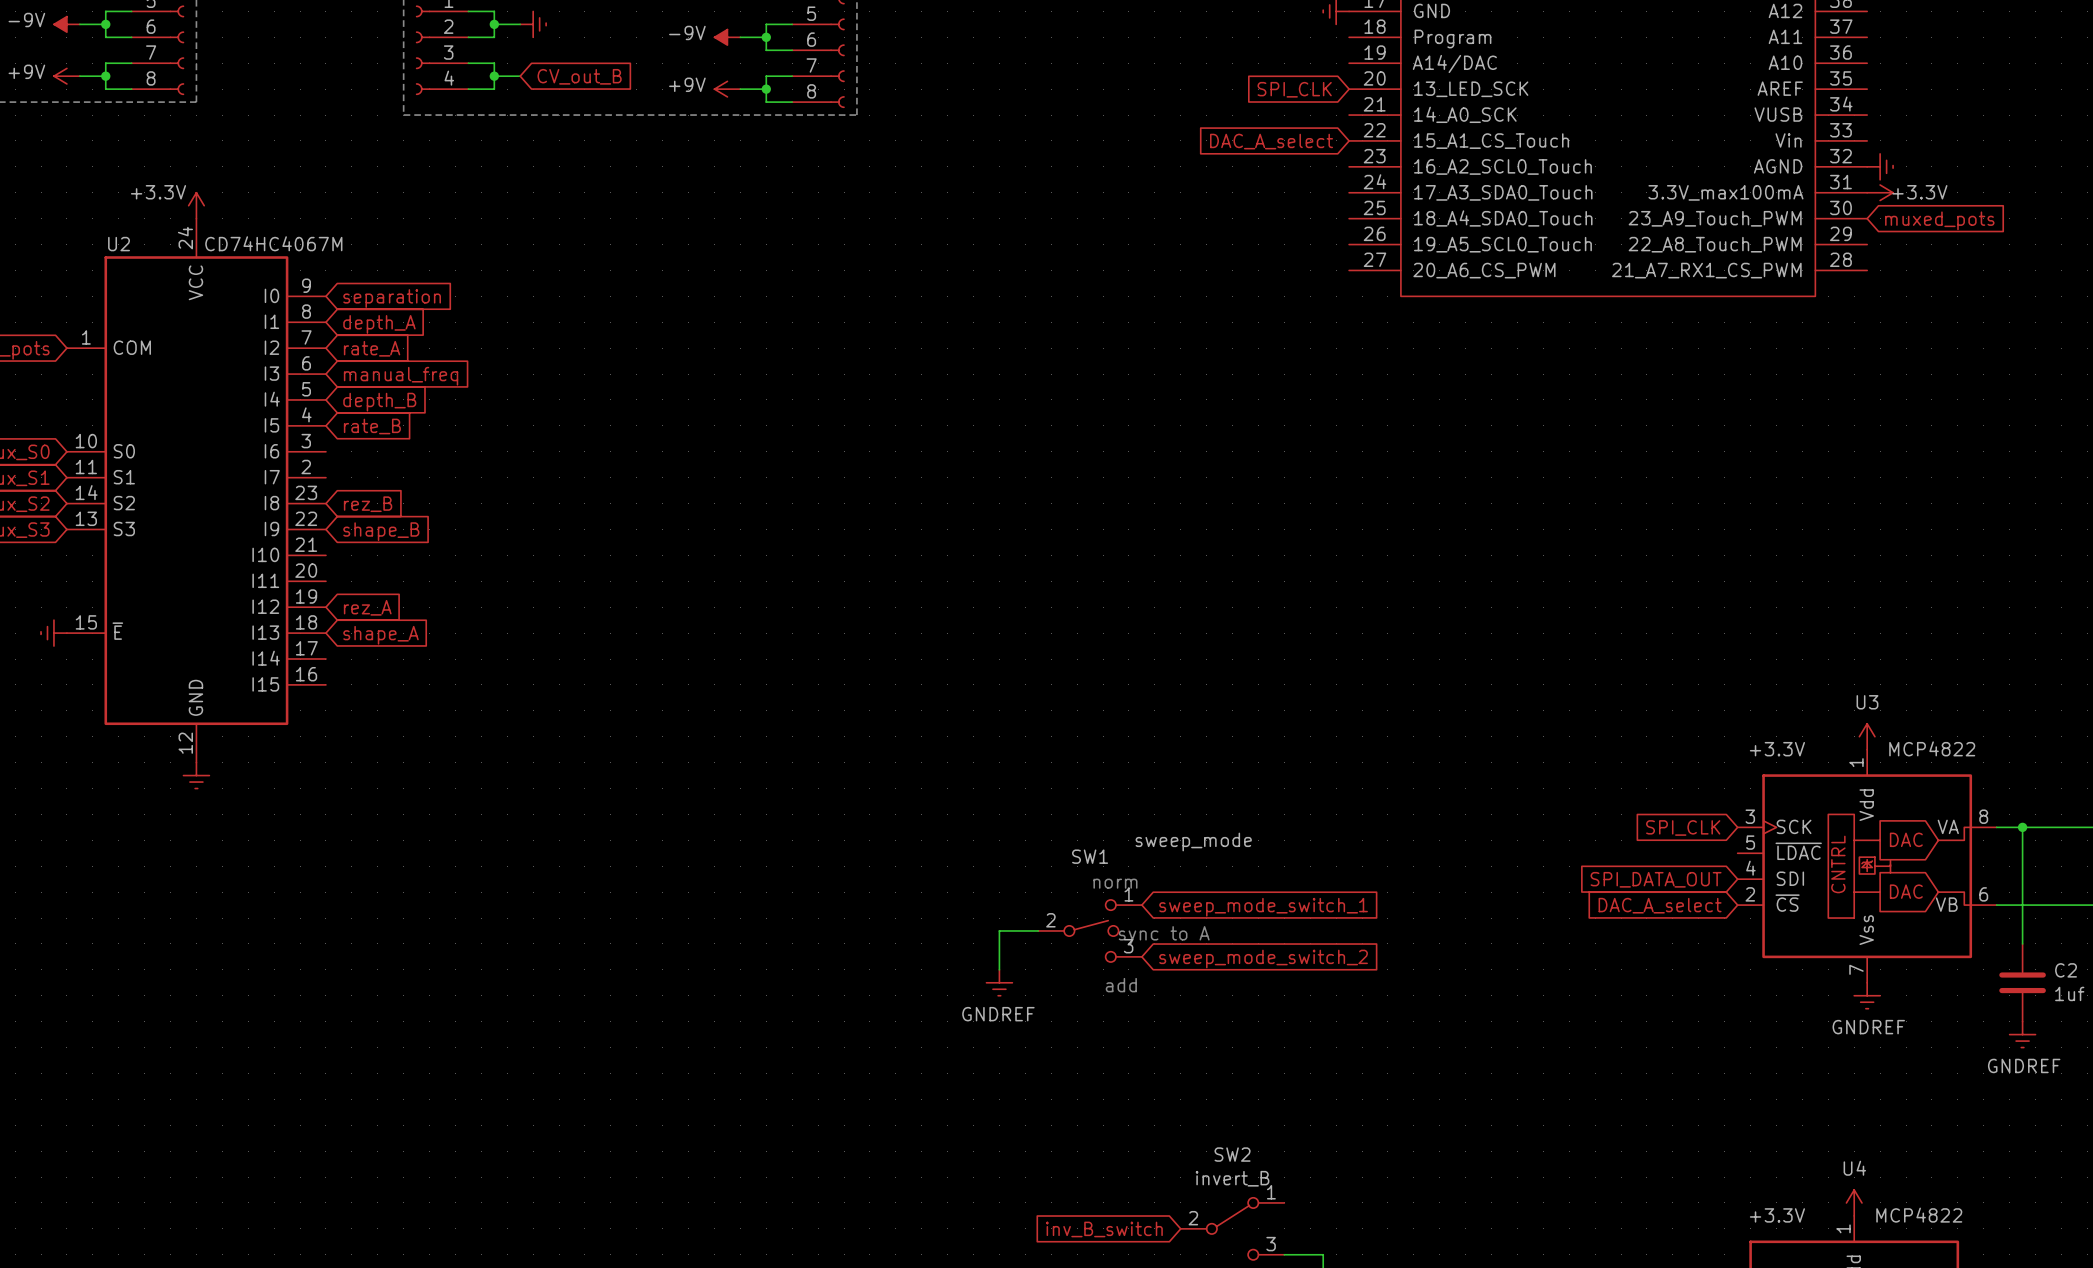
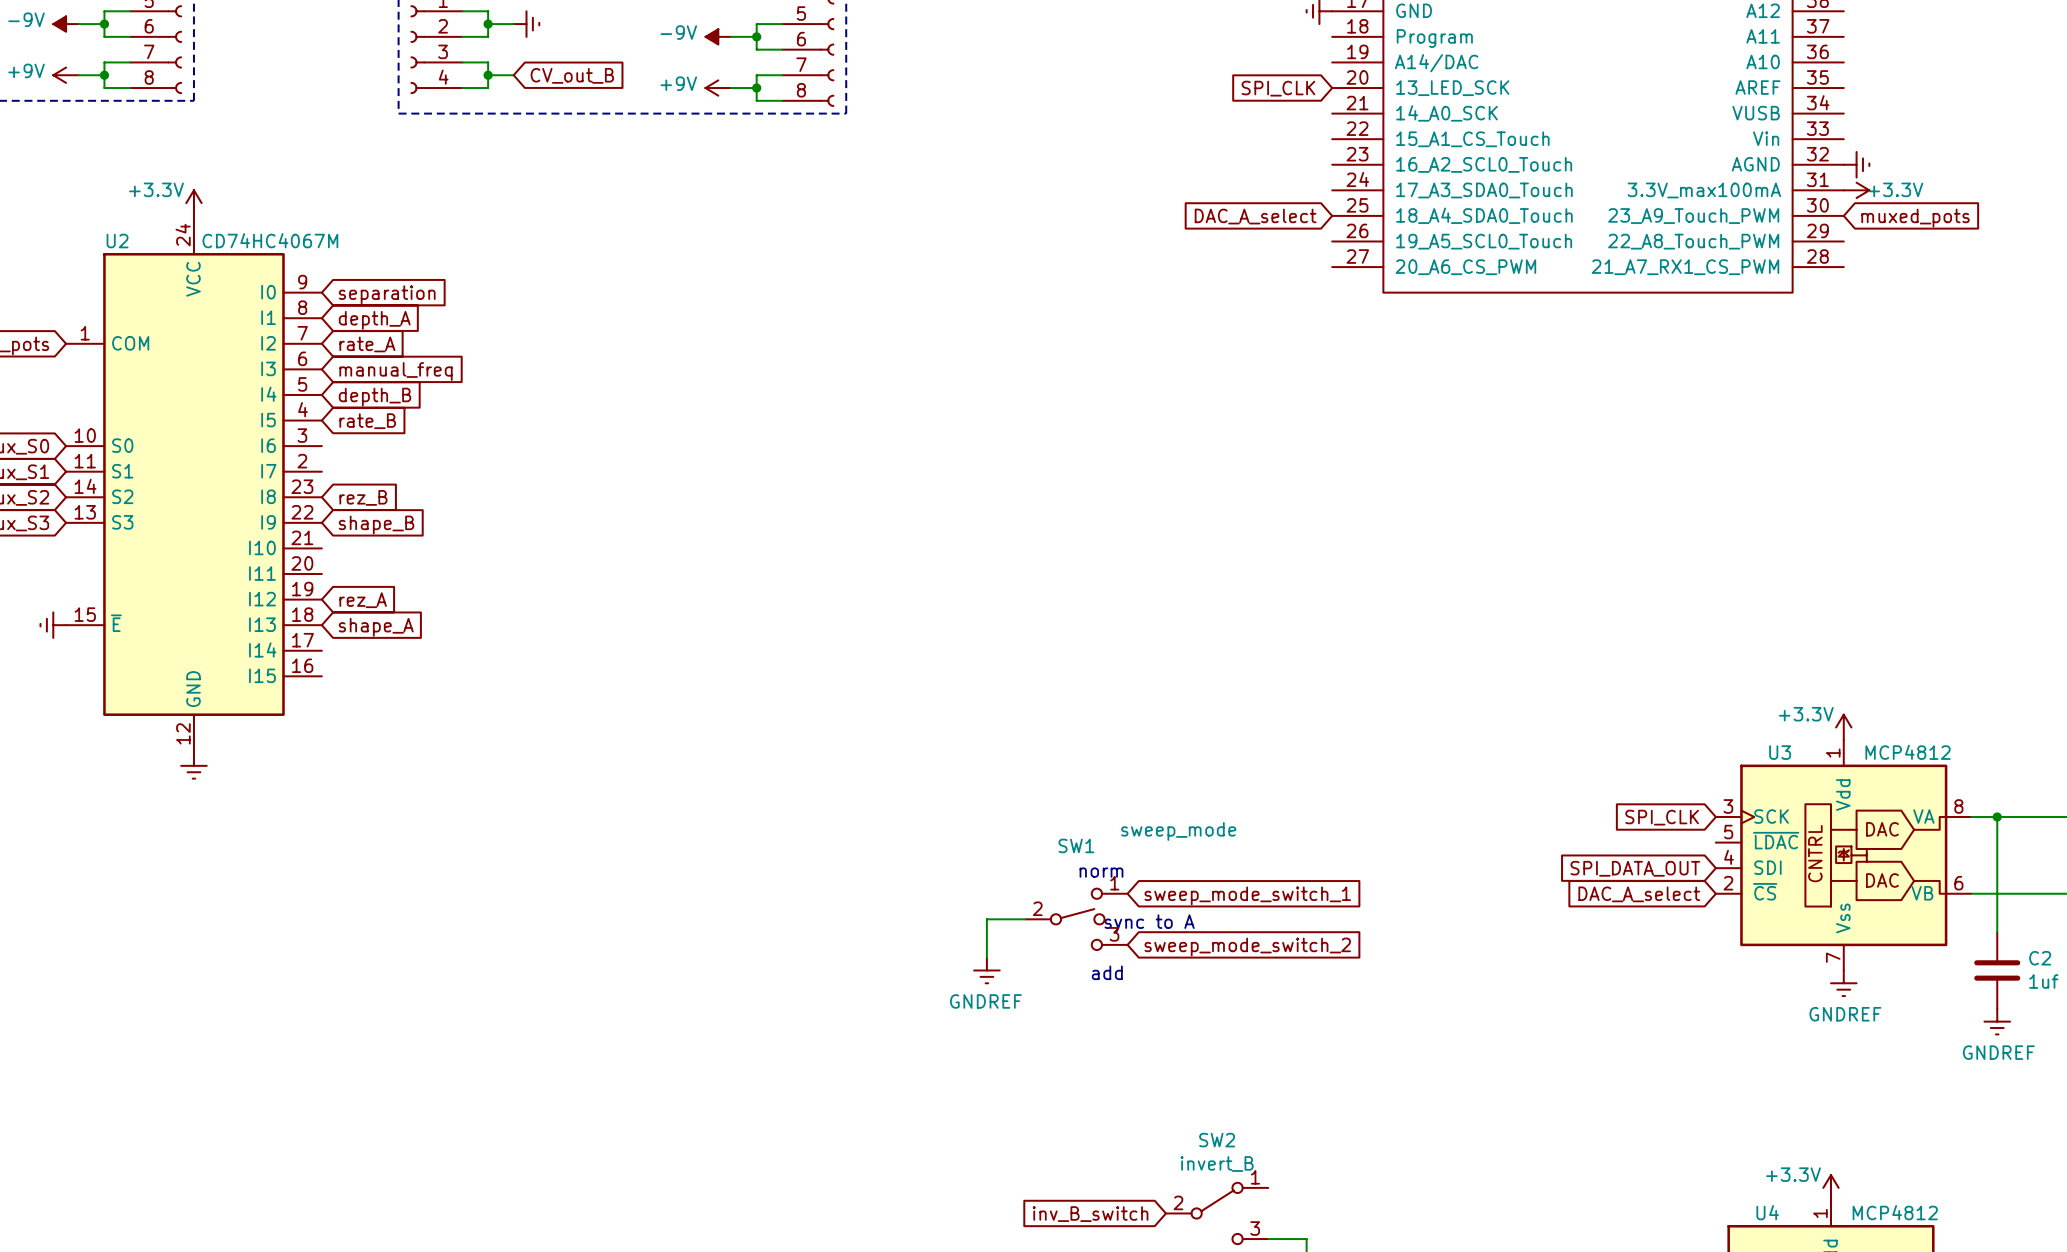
global label position: DAC_A_select (1271, 141) -> DAC_A_select (1255, 216)
U3 name position: U3 (1867, 702) -> U3 (1780, 752)
U3 value: MCP4822 (1932, 748) -> MCP4812 (1908, 752)
power symbol text position: +3.3V (1777, 749) -> +3.3V (1806, 714)
U4 name position: U4 (1854, 1168) -> U4 (1767, 1212)
power symbol text position: +3.3V (1777, 1215) -> +3.3V (1793, 1174)
U4 value: MCP4822 (1919, 1215) -> MCP4812 (1895, 1212)

